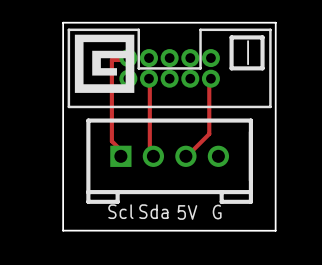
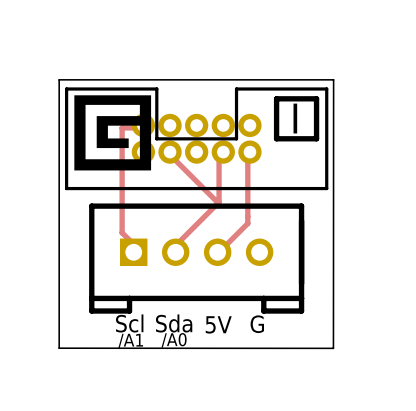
track: (149, 78) (149, 153) (152, 156) -> (219, 154) (219, 202) (175, 245) (174, 252)
track: none -> (170, 152) (174, 159) (218, 203)
text: none -> /A0 (174, 340)
text: none -> /A1 (130, 341)

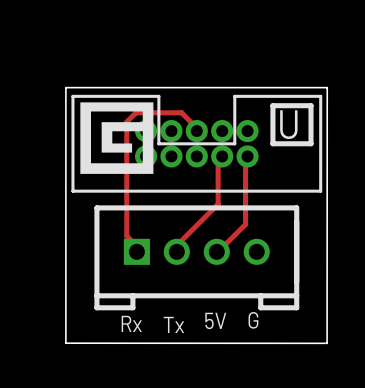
text: I (295, 118) -> U (288, 124)
track: (143, 125) (143, 127) (122, 127) (122, 232) (132, 243) (133, 252) -> (196, 131) (195, 126) (181, 112) (135, 112) (126, 121) (126, 236) (135, 245) (136, 251)
track: (170, 152) (174, 159) (218, 203) -> none
text: Scl (129, 323) -> Rx (131, 323)
text: Sda (174, 323) -> none
text: none -> Tx (173, 324)
text: /A0 (174, 340) -> none
text: /A1 (130, 341) -> none

